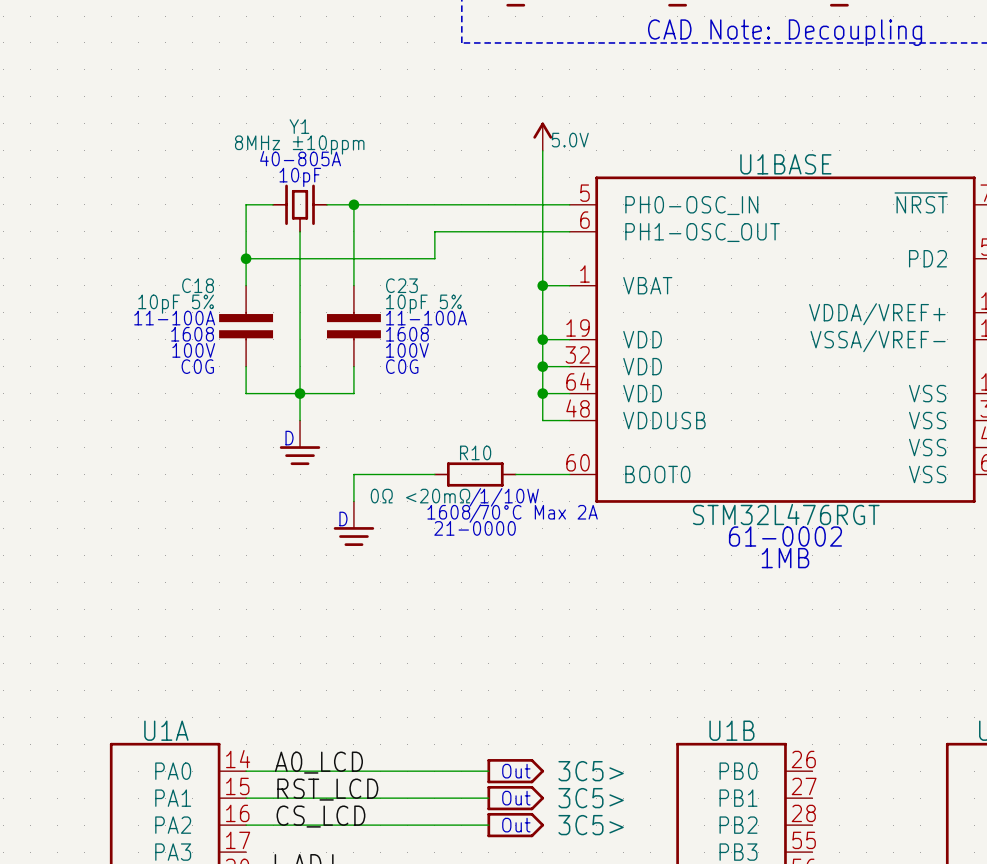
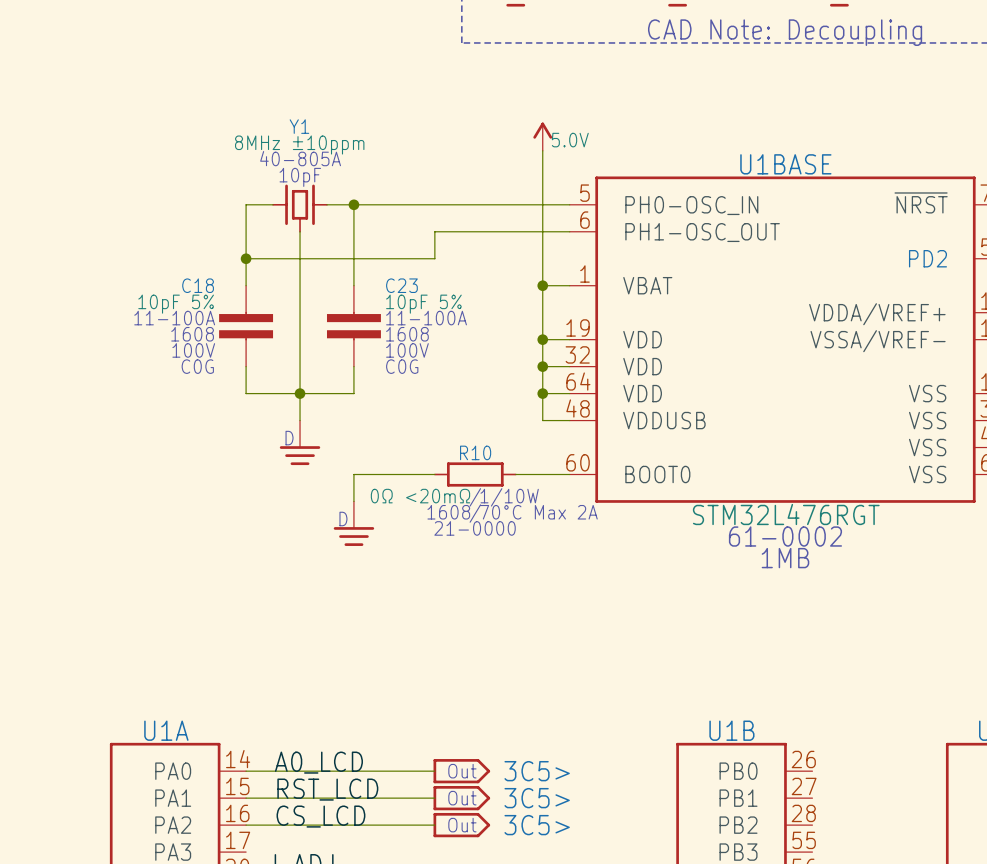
wire: (434, 771) (488, 771) -> none
part: none -> (461, 771)
part: (515, 771) -> none
text: none -> 3C5> (537, 771)
text: 3C5> (591, 771) -> none
wire: (434, 798) (488, 798) -> none
part: none -> (461, 798)
part: (515, 798) -> none
text: none -> 3C5> (537, 798)
text: 3C5> (591, 798) -> none
wire: (434, 825) (488, 825) -> none
part: none -> (461, 825)
part: (515, 825) -> none
text: none -> 3C5> (537, 825)
text: 3C5> (591, 825) -> none

